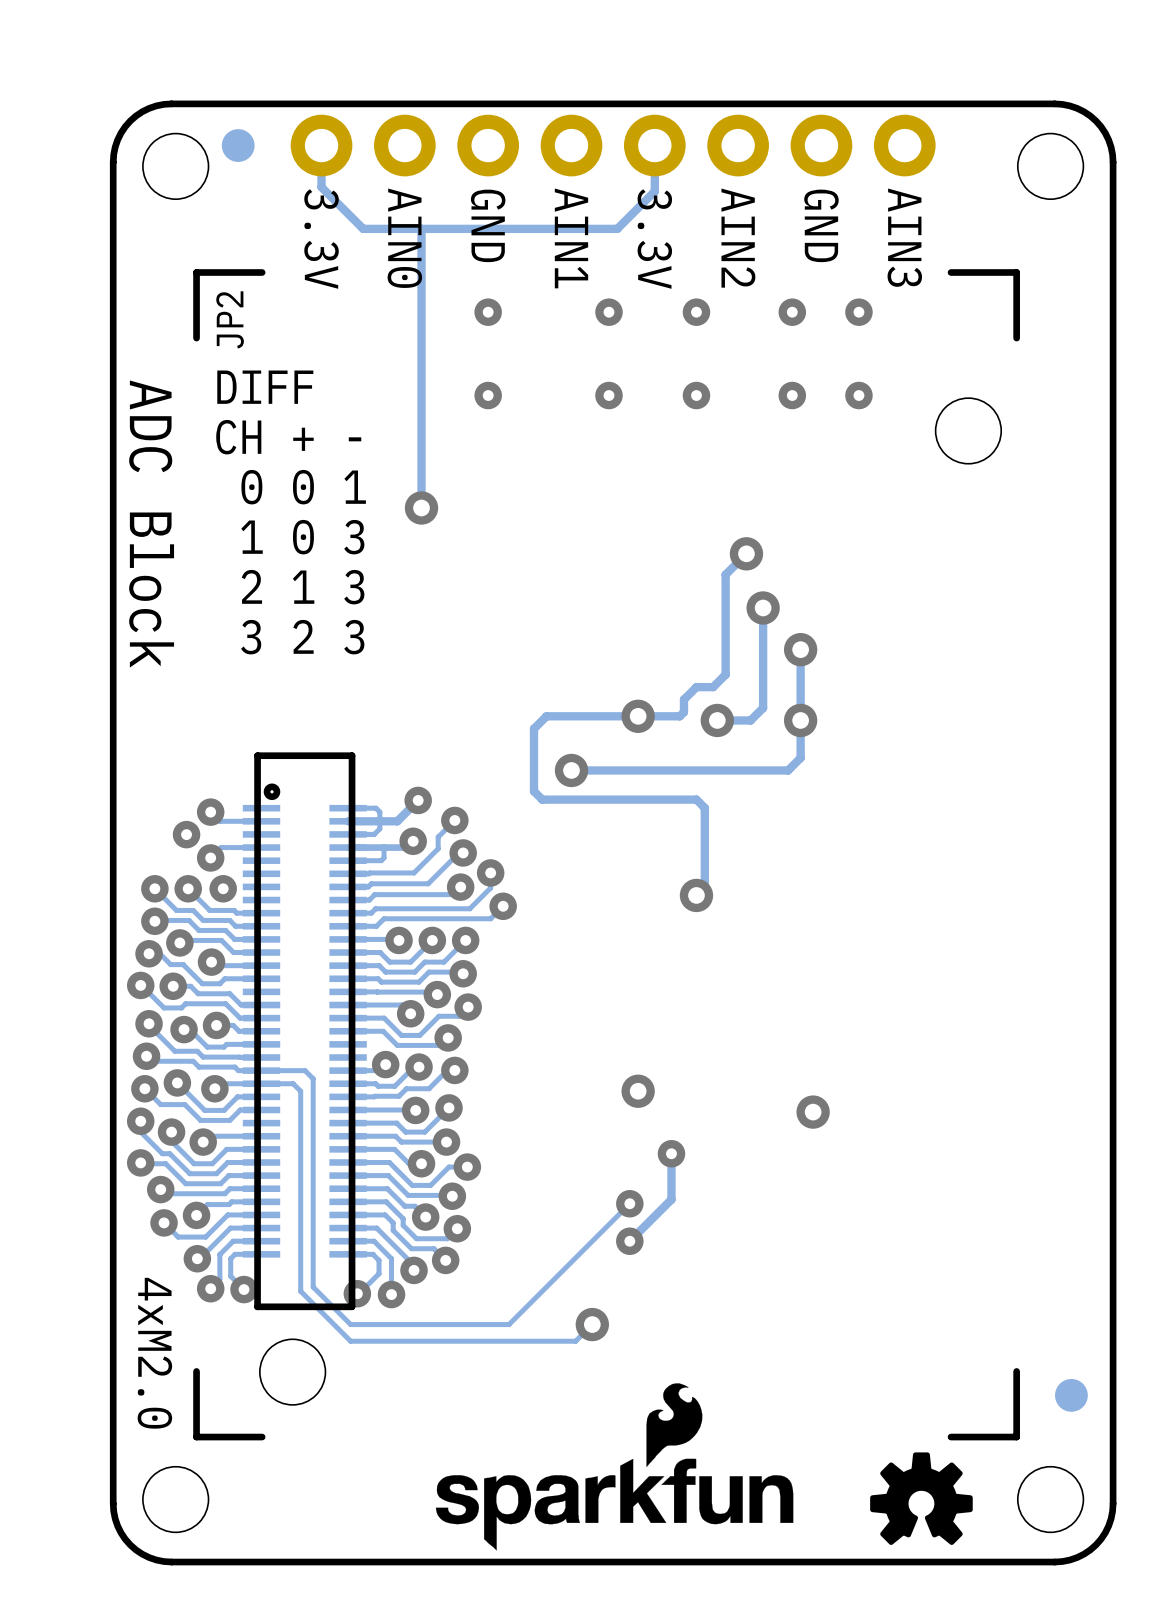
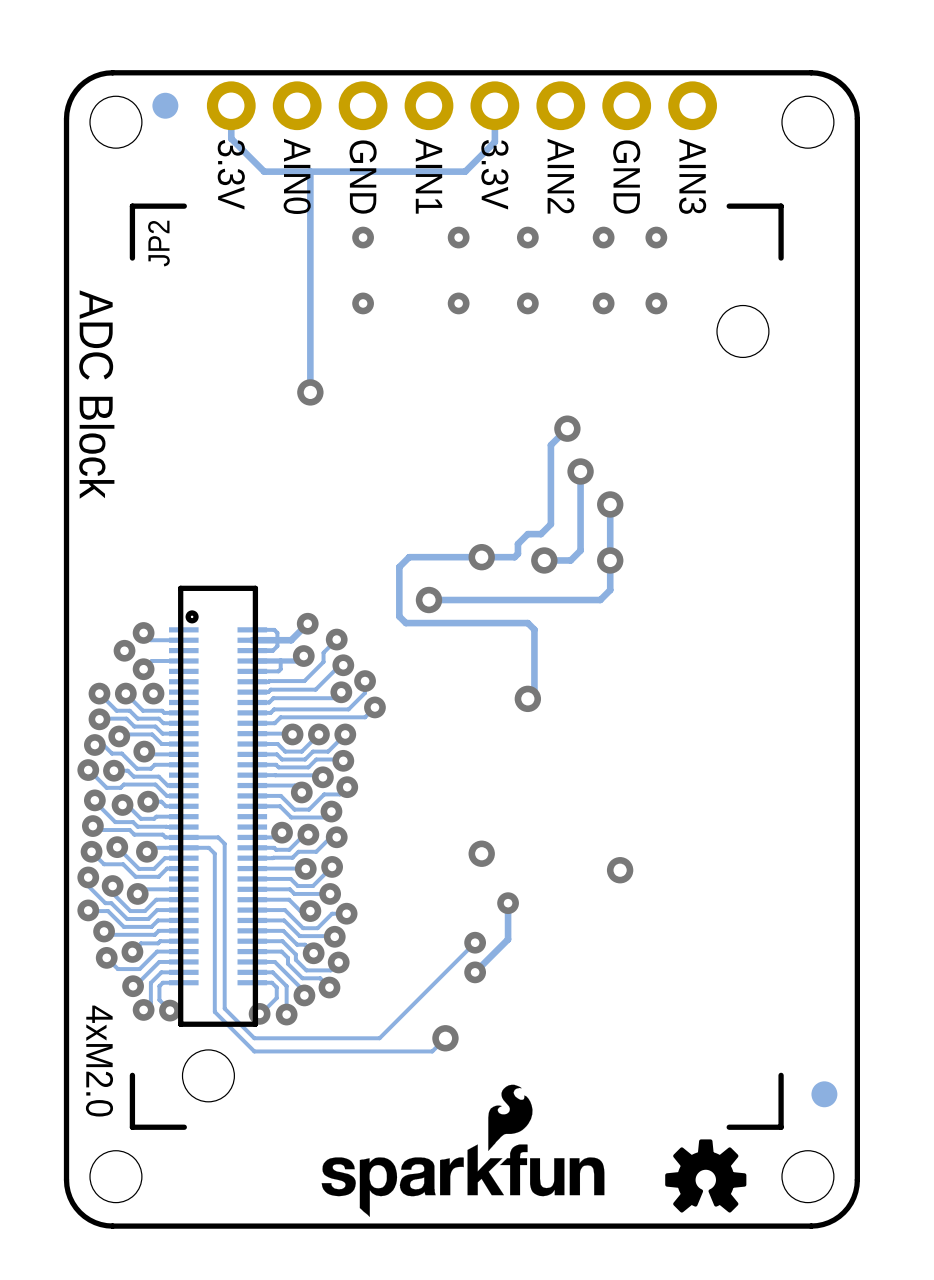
text: DIFF (265, 387) -> none
text: CH + - (288, 437) -> none
text: 0 0 1 (303, 487) -> none
text: 1 0 3 (302, 537) -> none
text: 2 1 3 (303, 587) -> none
text: 3 2 3 (302, 637) -> none

